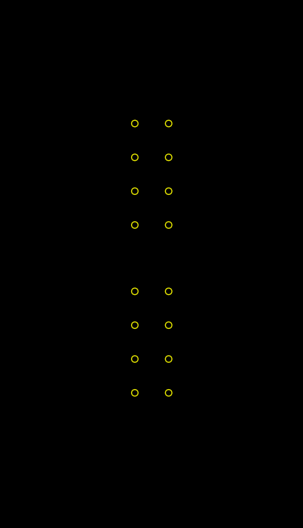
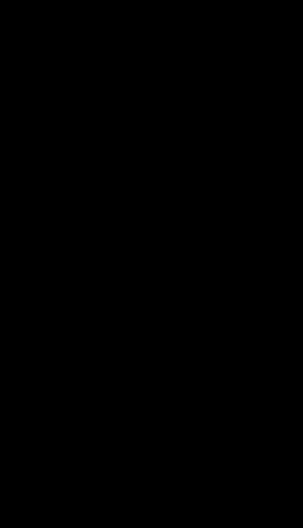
part: (151, 174) -> none
part: (151, 342) -> none

